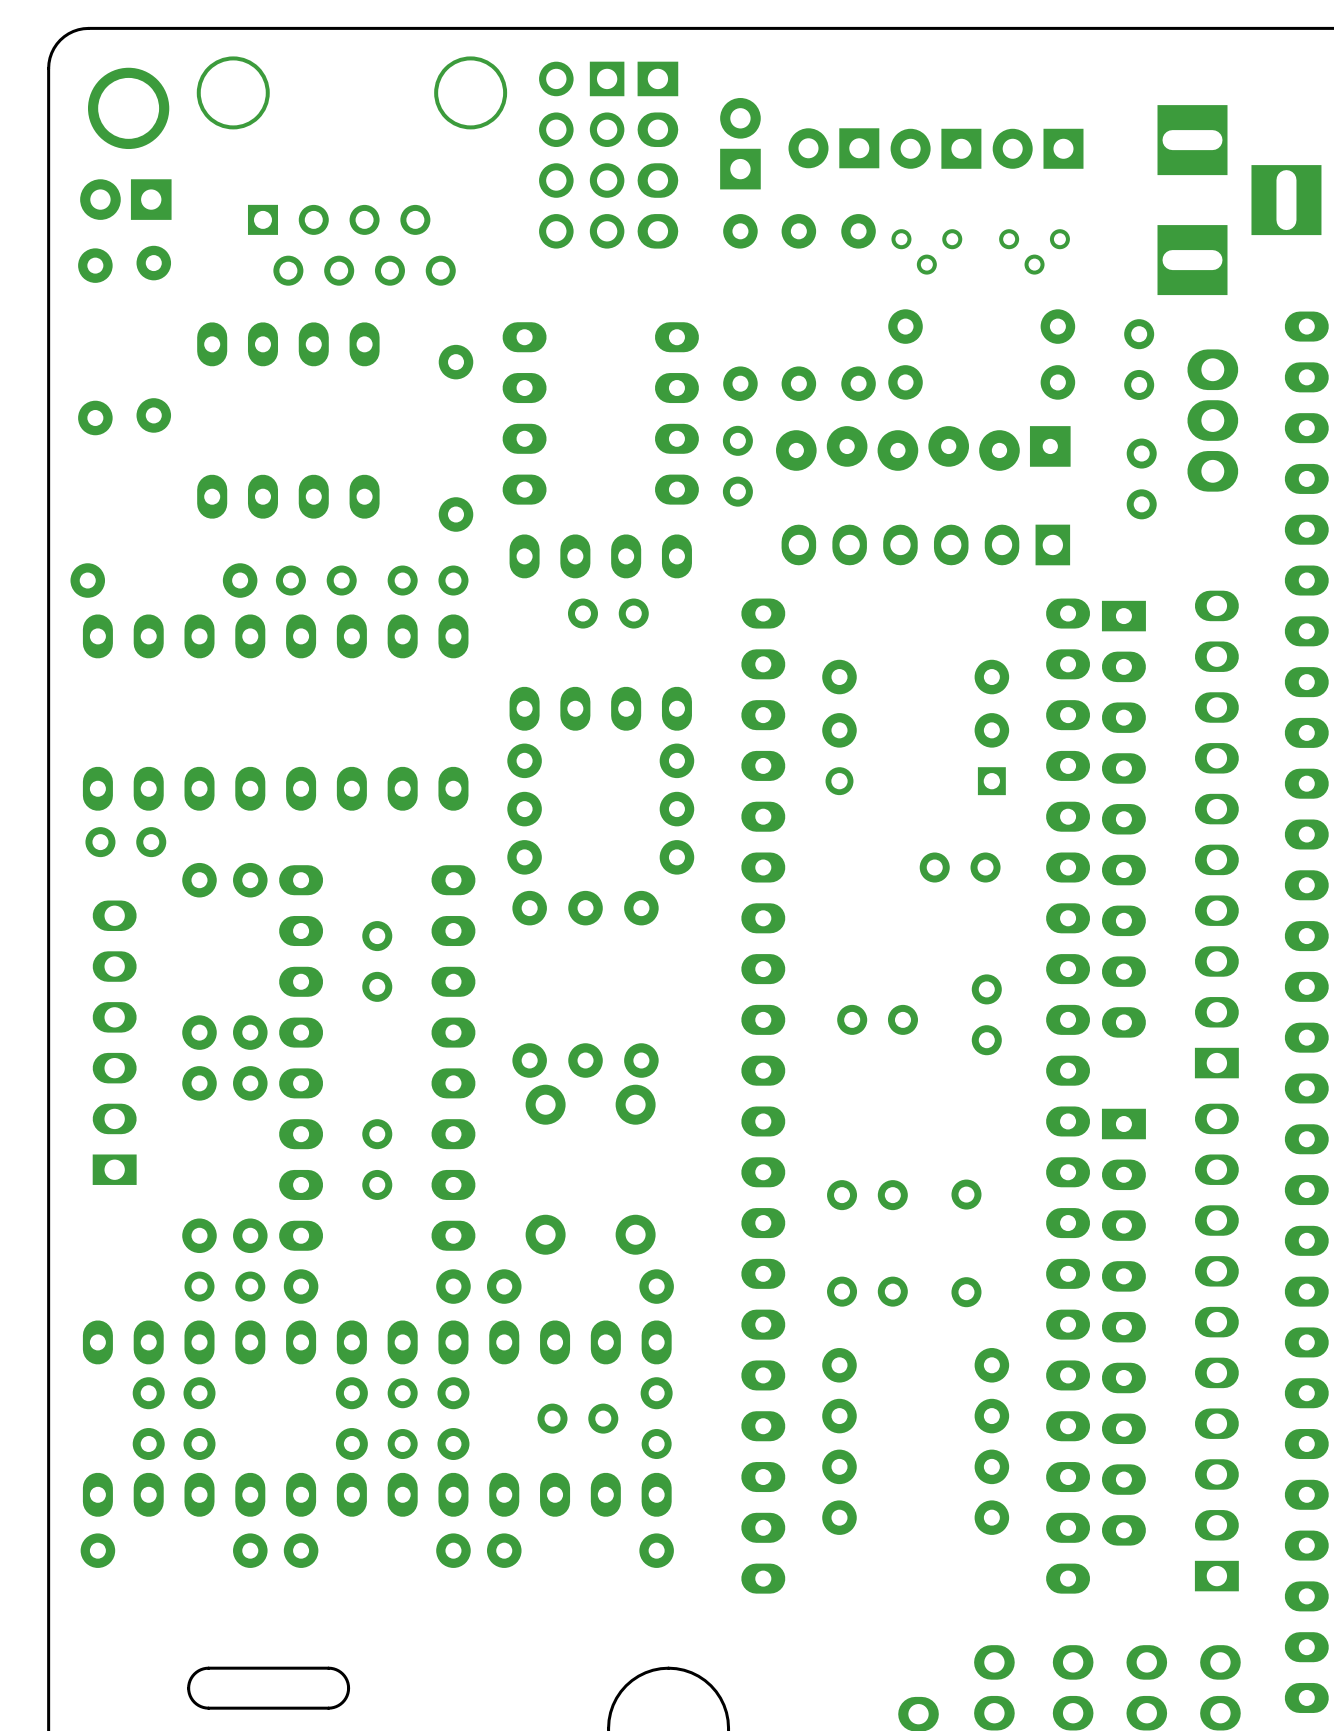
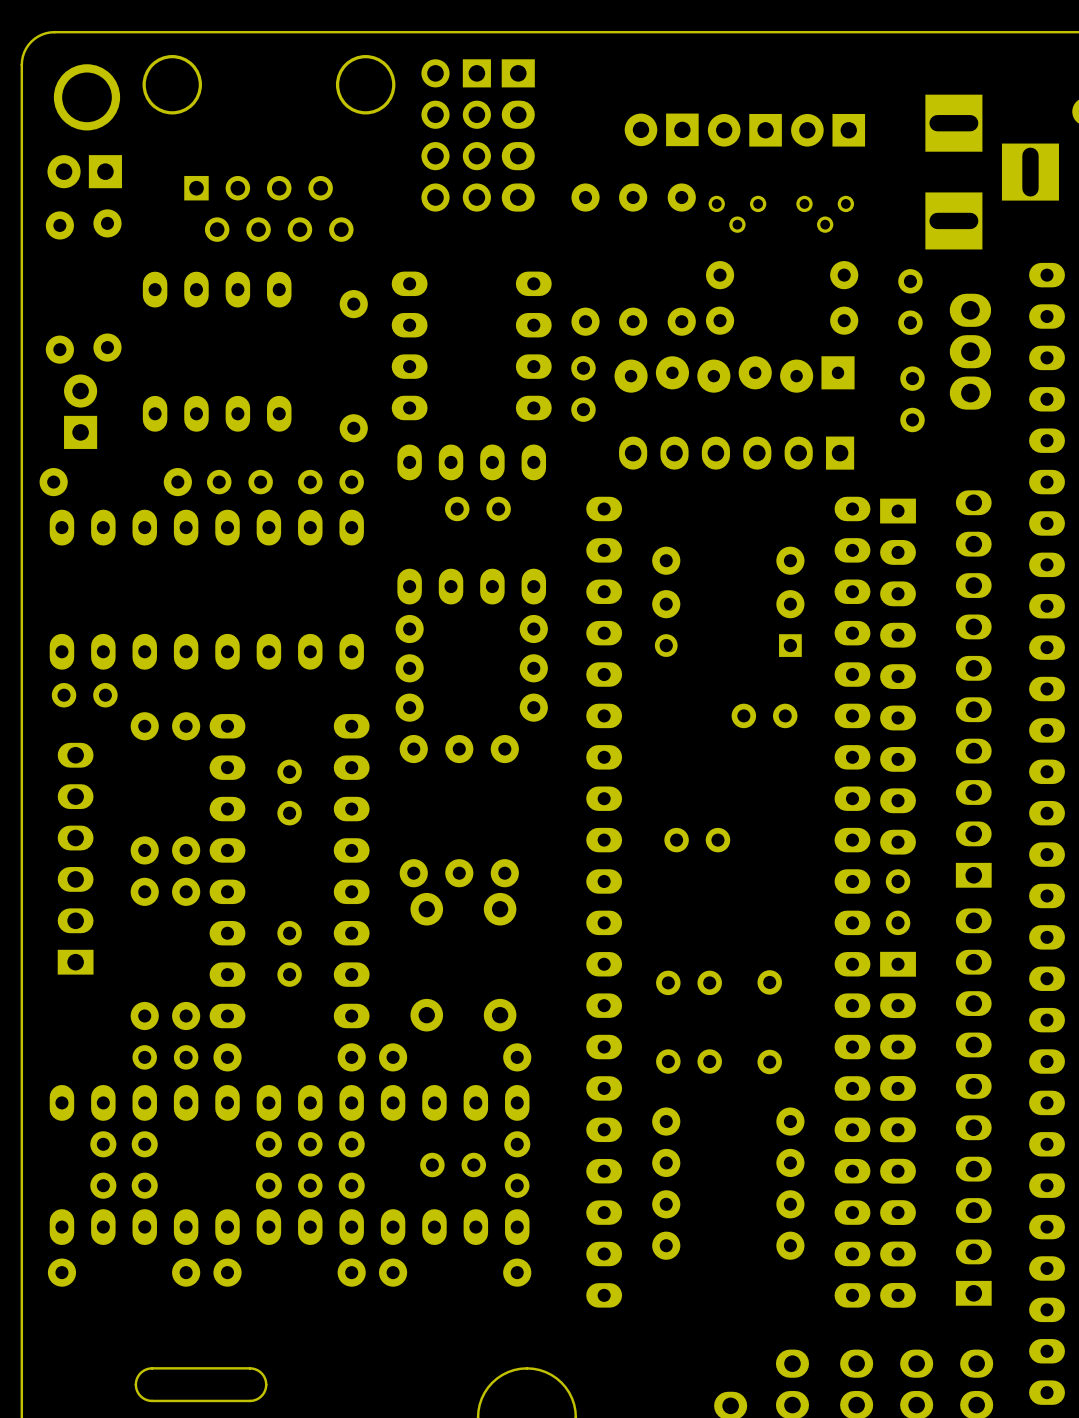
part: (740, 143) -> none
part: none -> (80, 411)
part position: (986, 1014) -> (898, 902)
part position: (1123, 1327) -> (898, 1129)

